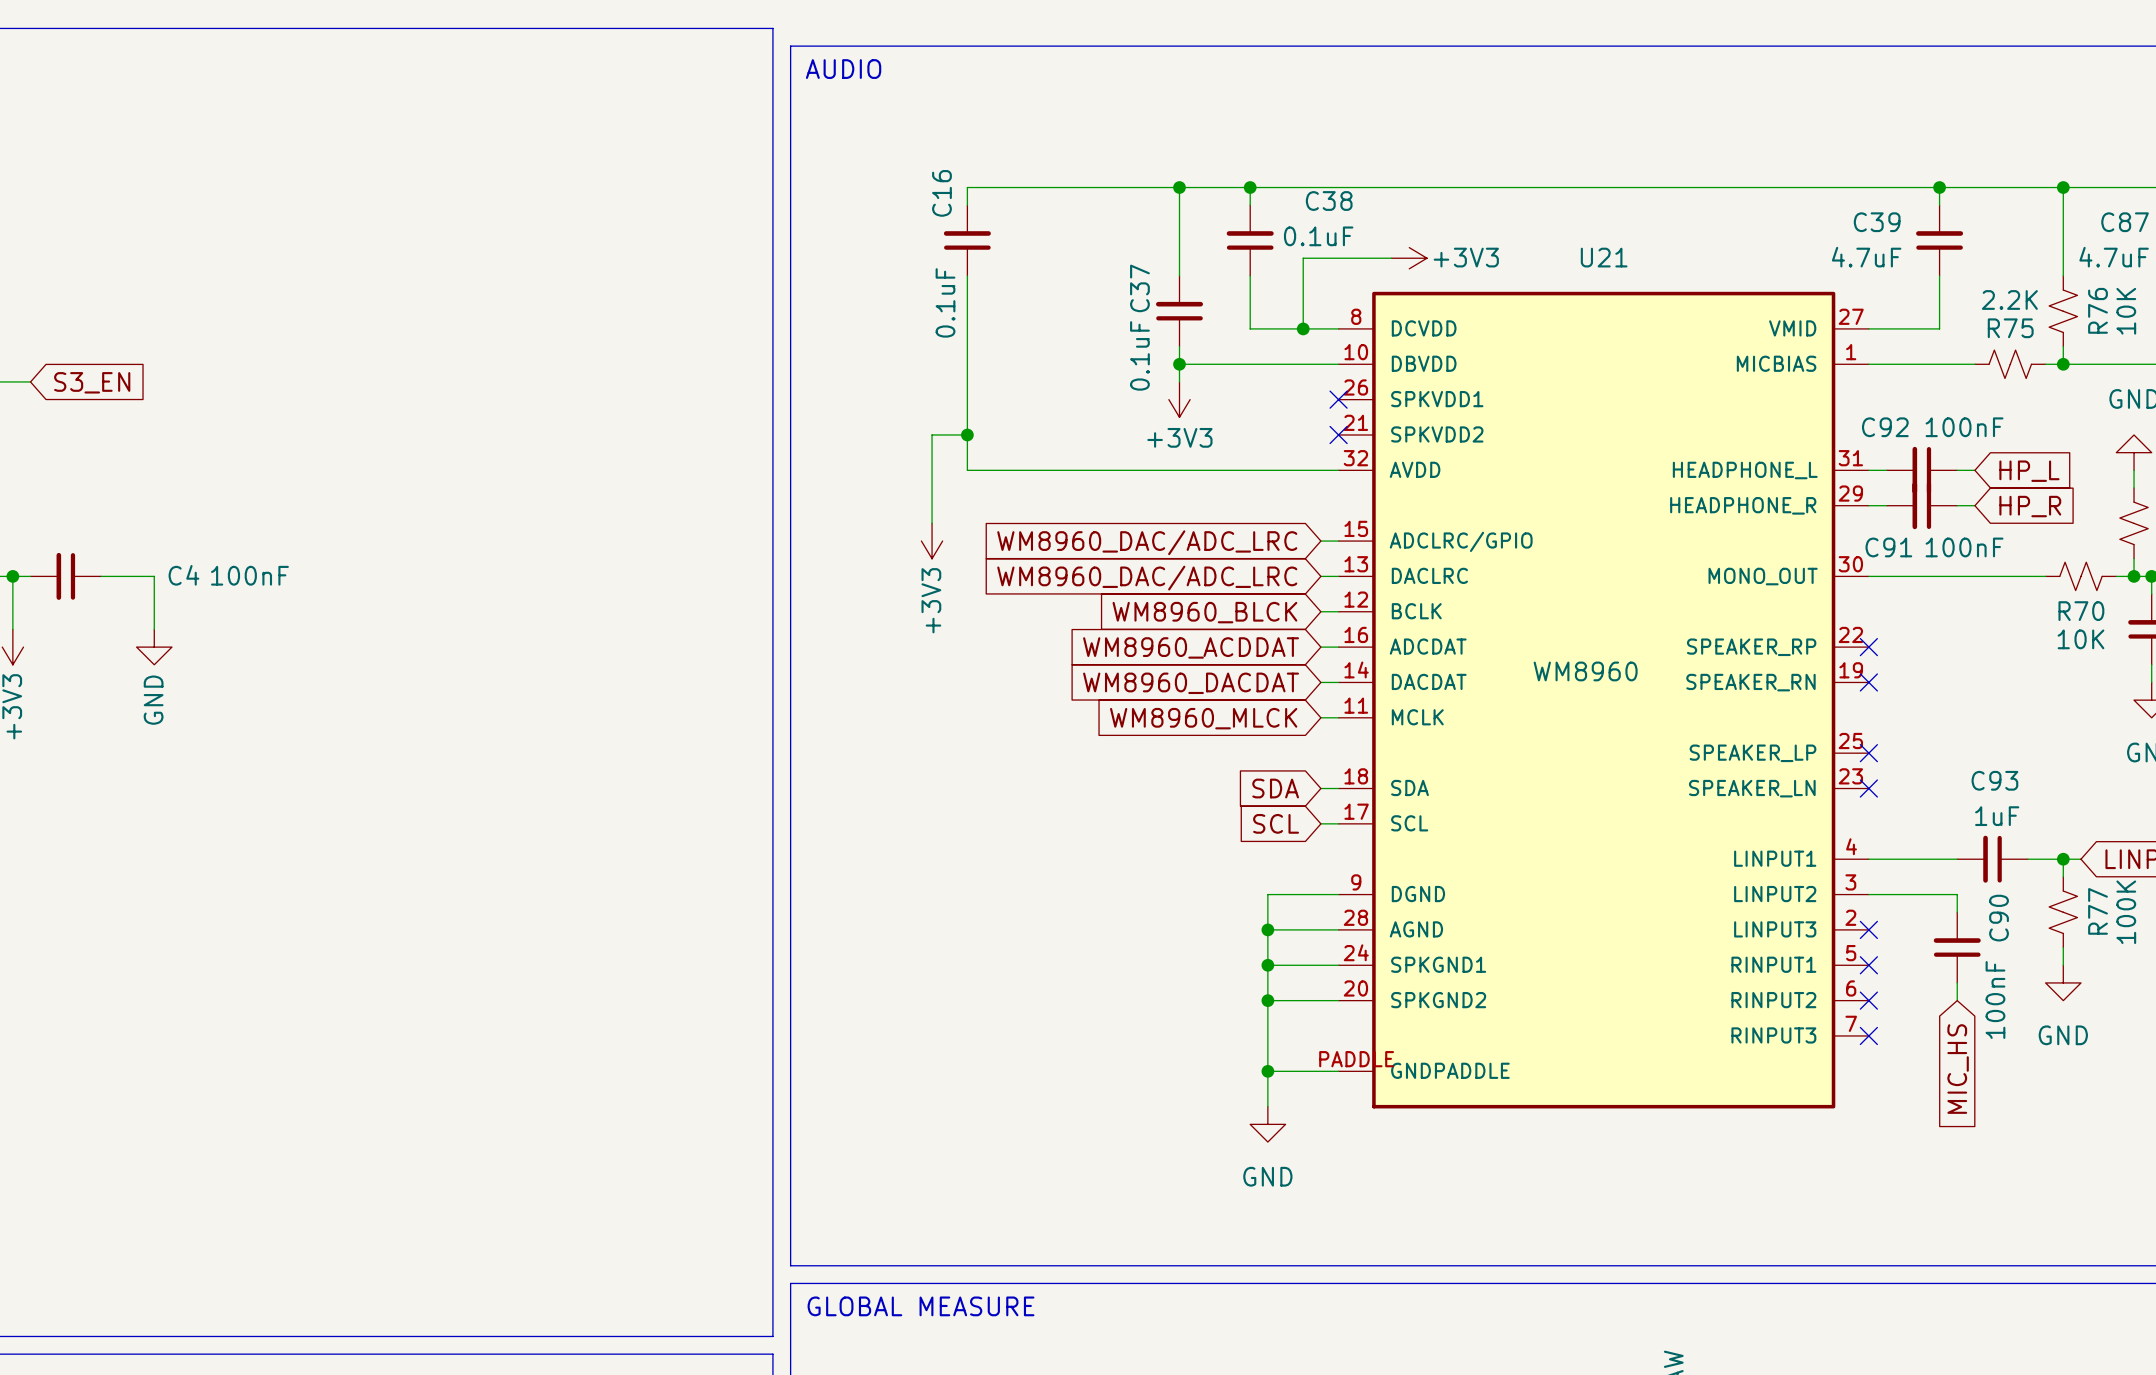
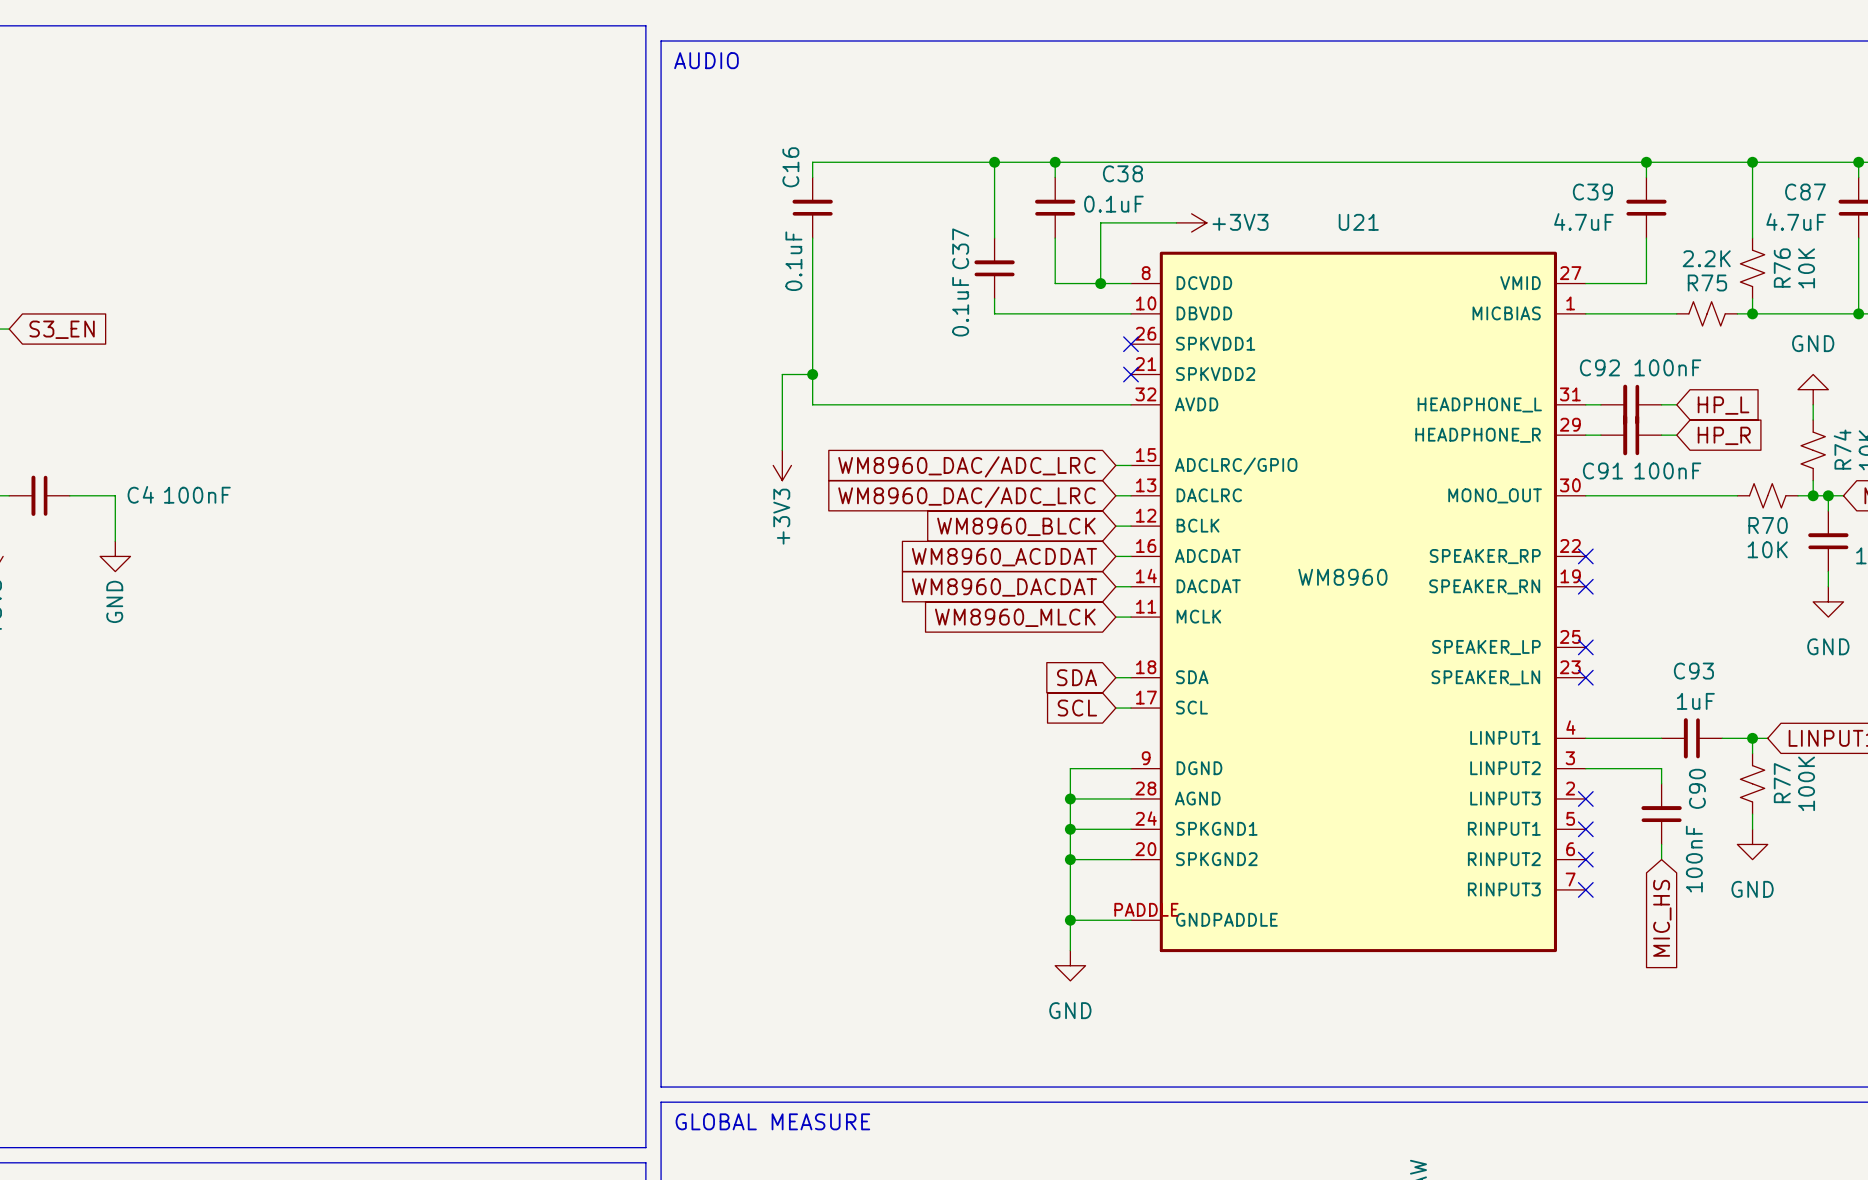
wire: (1179, 364) (1179, 381) -> none
junction: (1179, 364) -> none
power symbol: +3V3 (1179, 399) -> none

